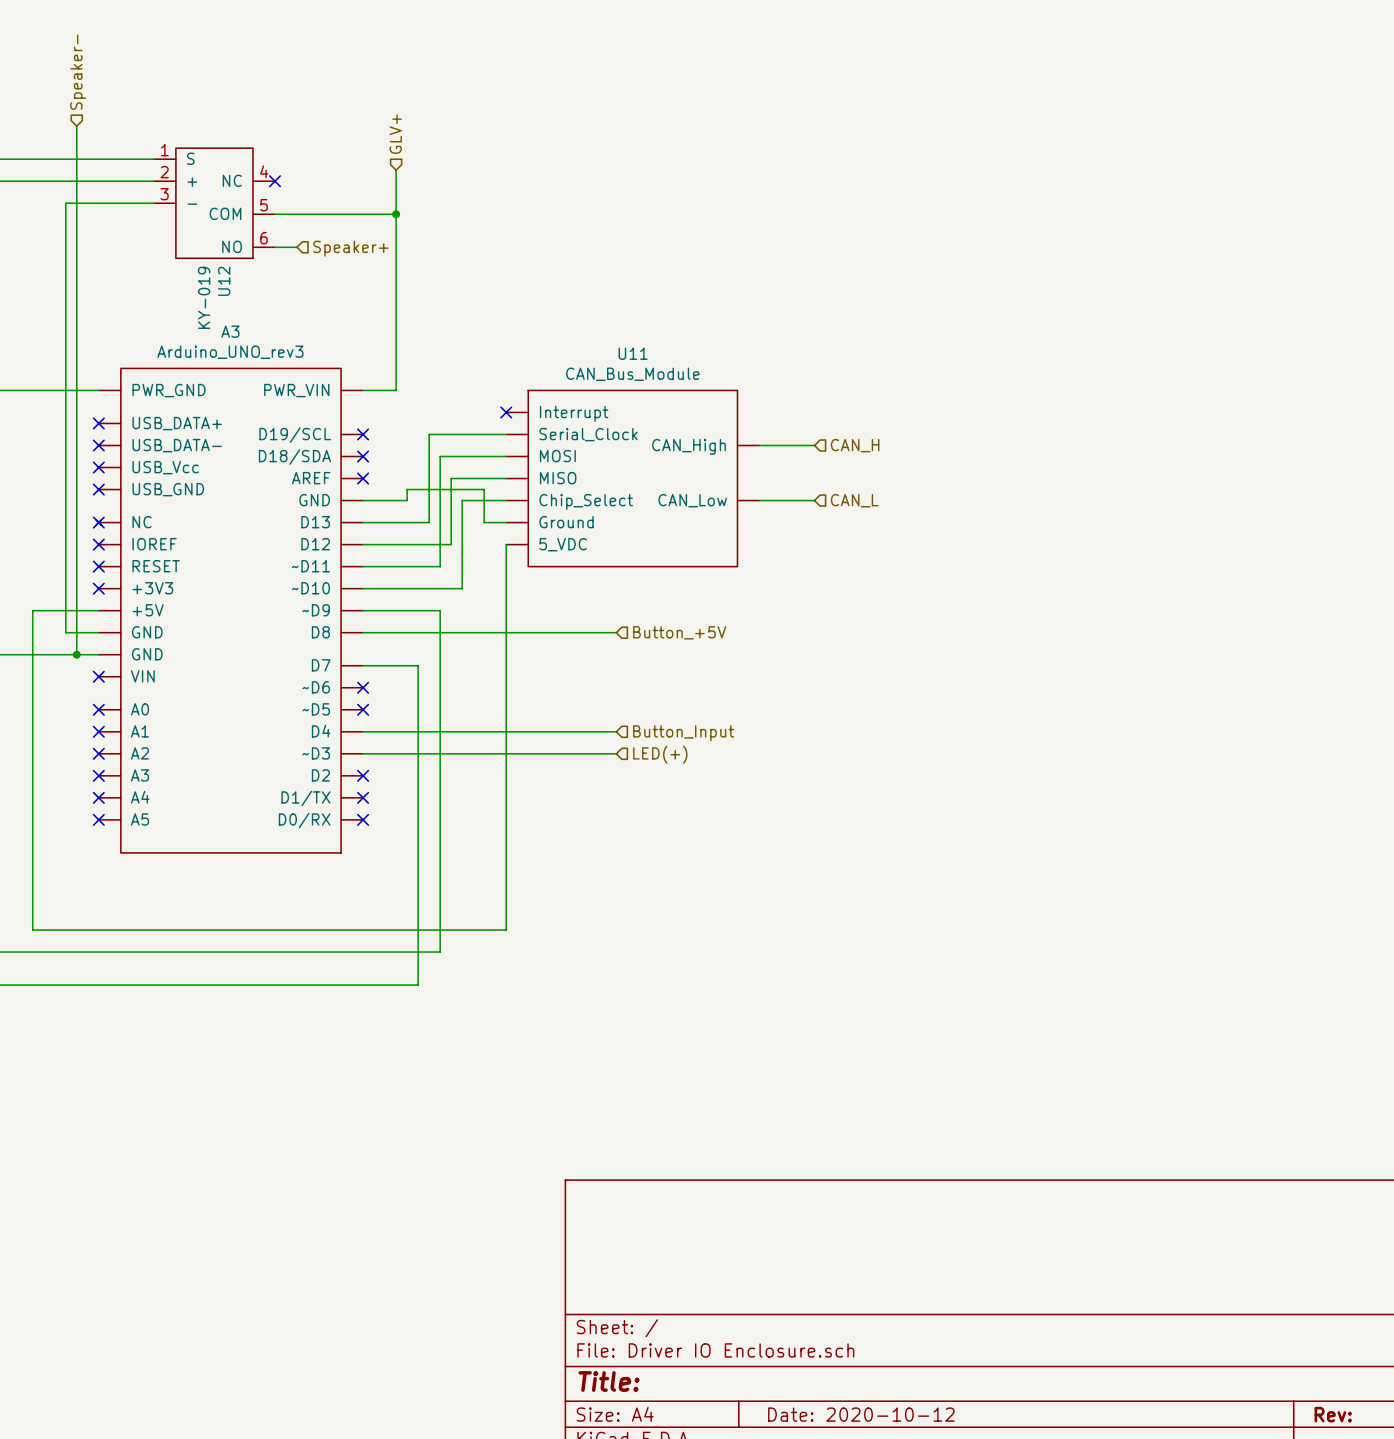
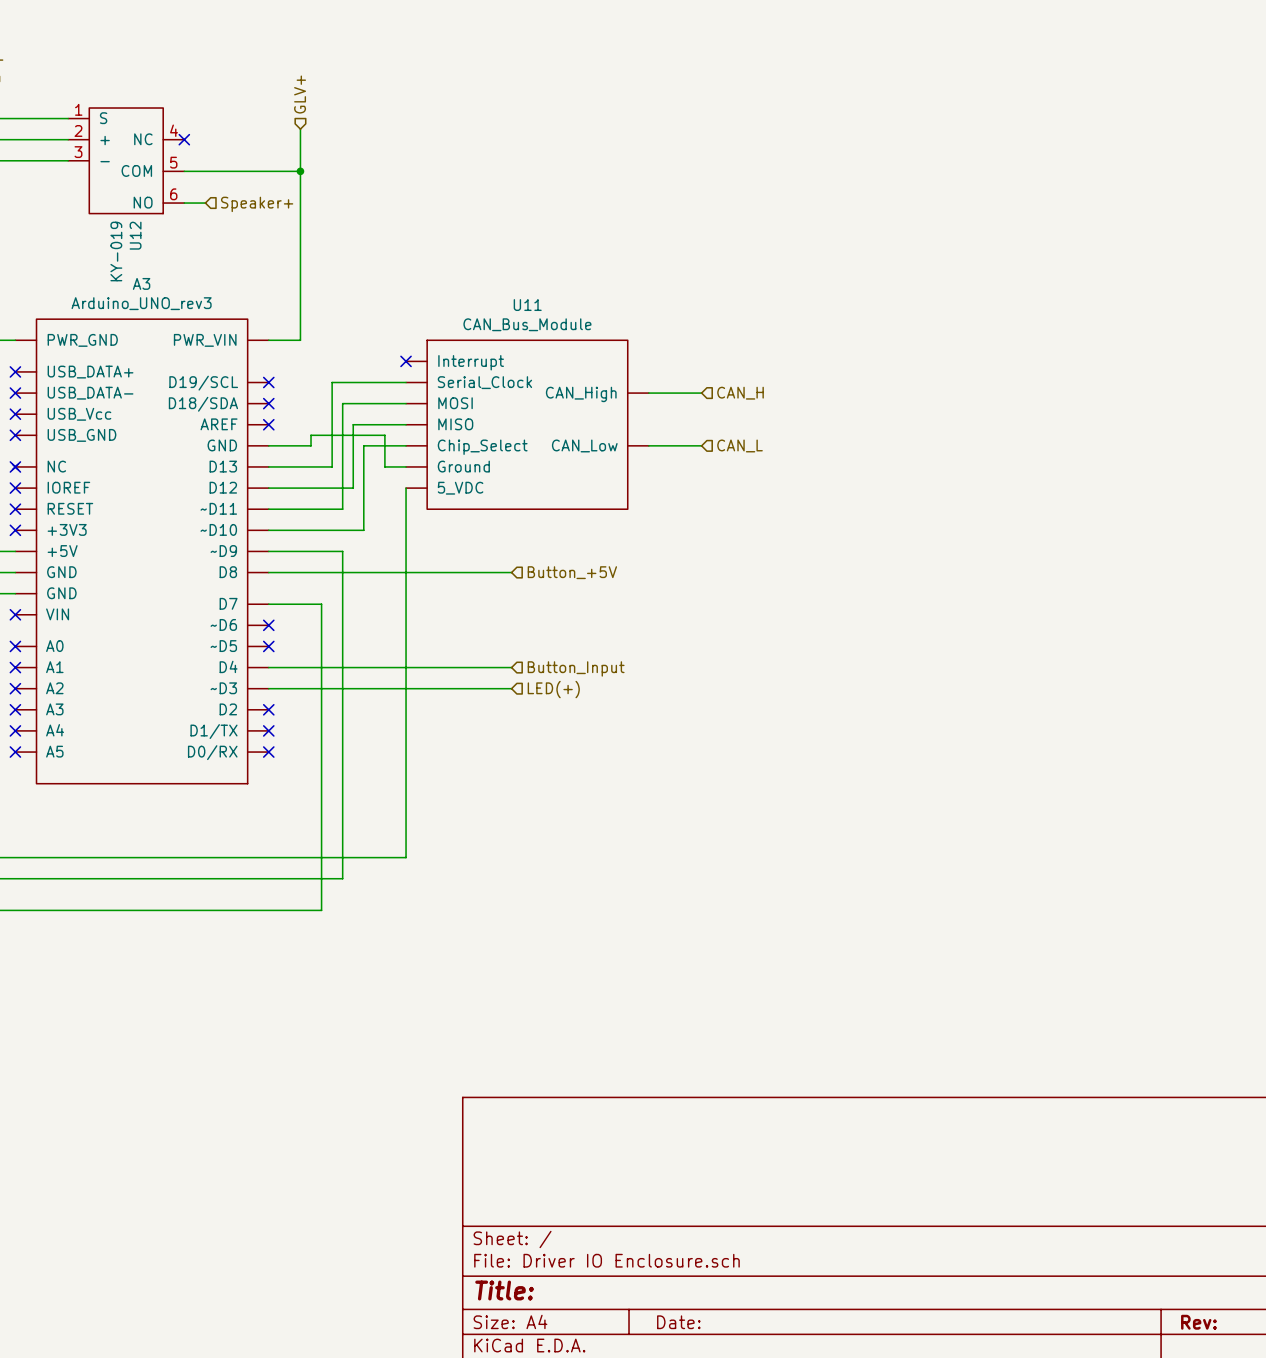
title block: Date: 2020-10-12 (861, 1414) -> Date: (678, 1322)

